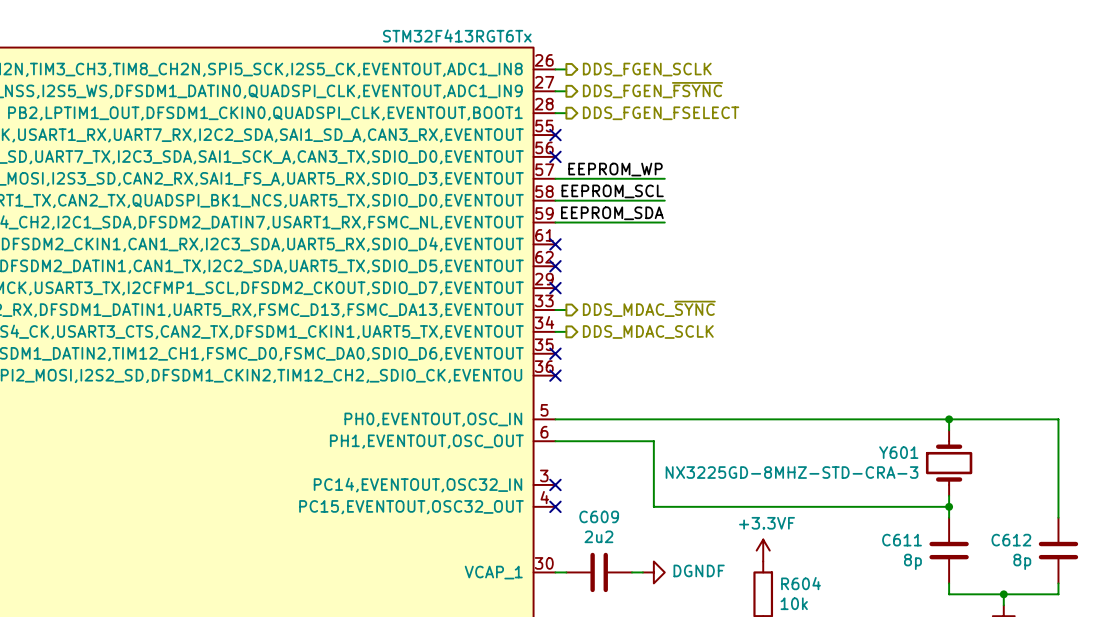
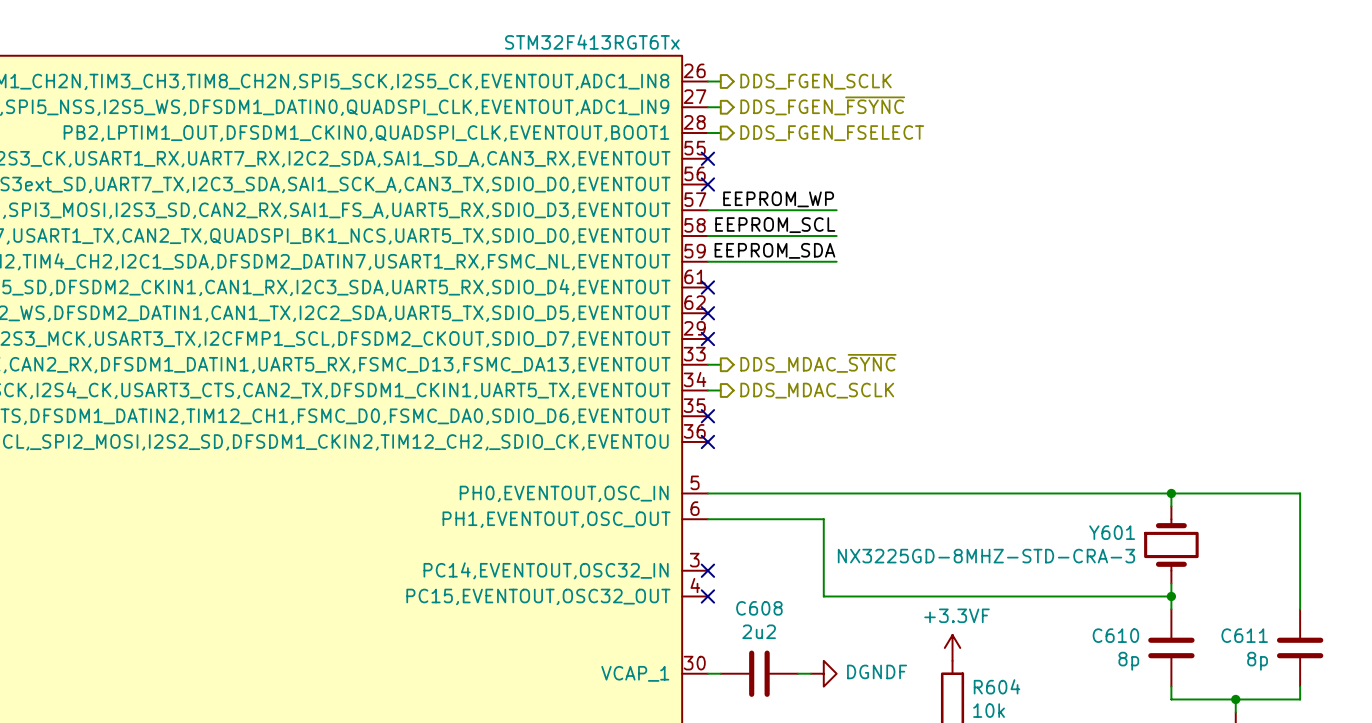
C609 name: C609 (599, 516) -> C608 (759, 608)
C611 name: C611 (902, 540) -> C610 (1115, 635)
C612 name: C612 (1011, 540) -> C611 (1244, 635)

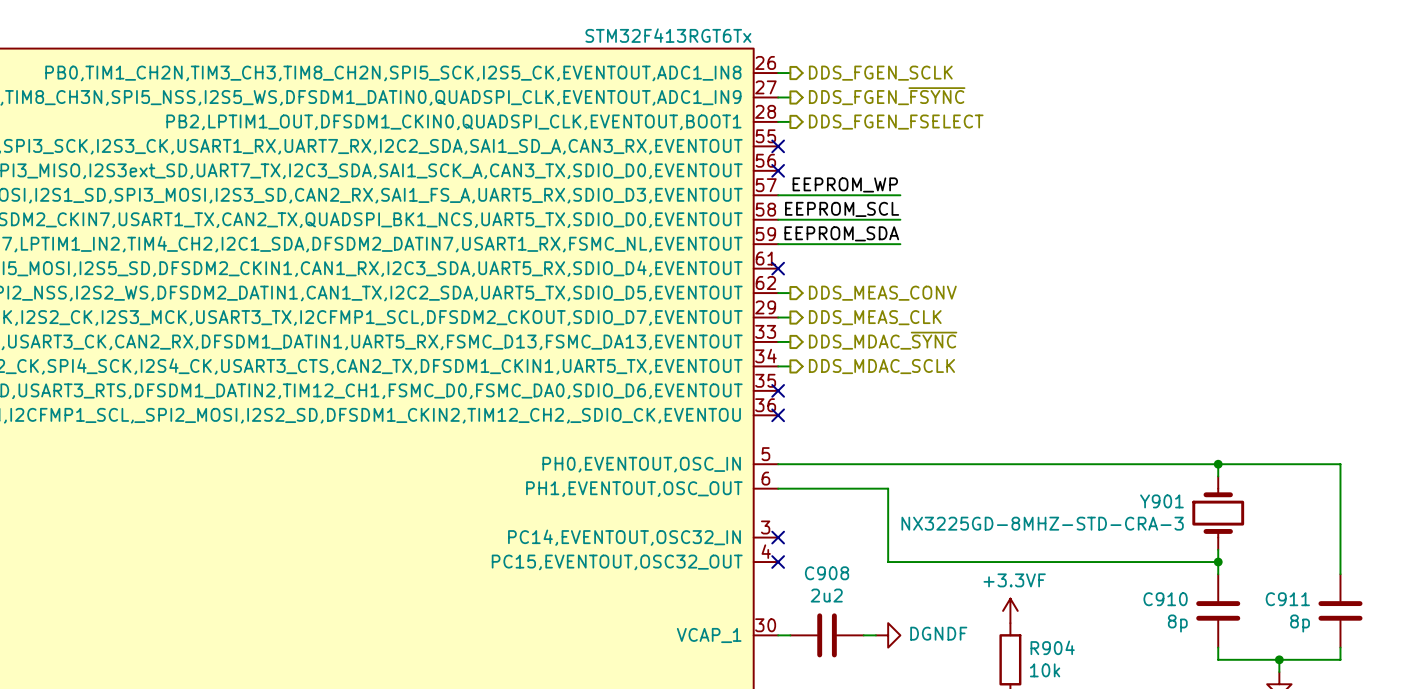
wire: none -> (778, 293) (790, 293)
no-connect mark: (707, 313) -> none
hierarchical label: none -> DDS_MEAS_CONV (882, 293)
wire: none -> (778, 317) (790, 317)
no-connect mark: (707, 338) -> none
hierarchical label: none -> DDS_MEAS_CLK (875, 317)
Y601 name: Y601 (1112, 532) -> Y901 (1161, 501)
C608 name: C608 (759, 608) -> C908 (827, 573)
C610 name: C610 (1115, 635) -> C910 (1165, 599)
C611 name: C611 (1244, 635) -> C911 (1287, 599)
R604 name: R604 (997, 686) -> R904 (1052, 647)

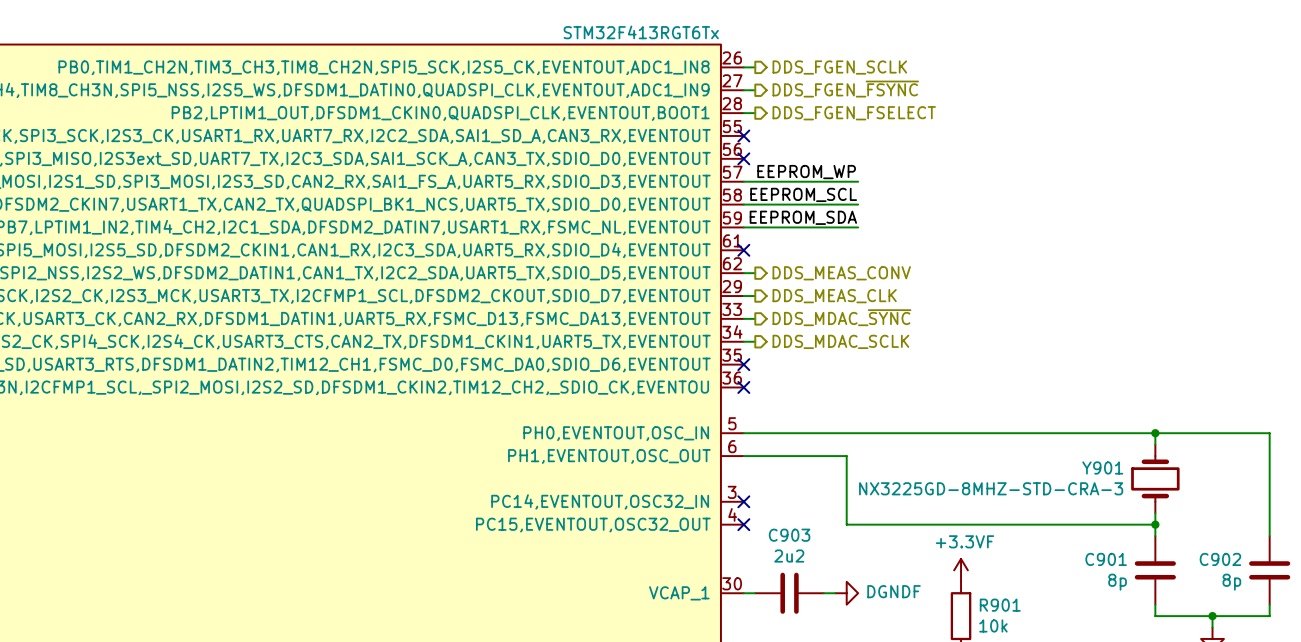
C908 name: C908 (827, 573) -> C903 (789, 535)
C910 name: C910 (1165, 599) -> C901 (1106, 559)
C911 name: C911 (1287, 599) -> C902 (1220, 559)
R904 name: R904 (1052, 647) -> R901 (1000, 605)

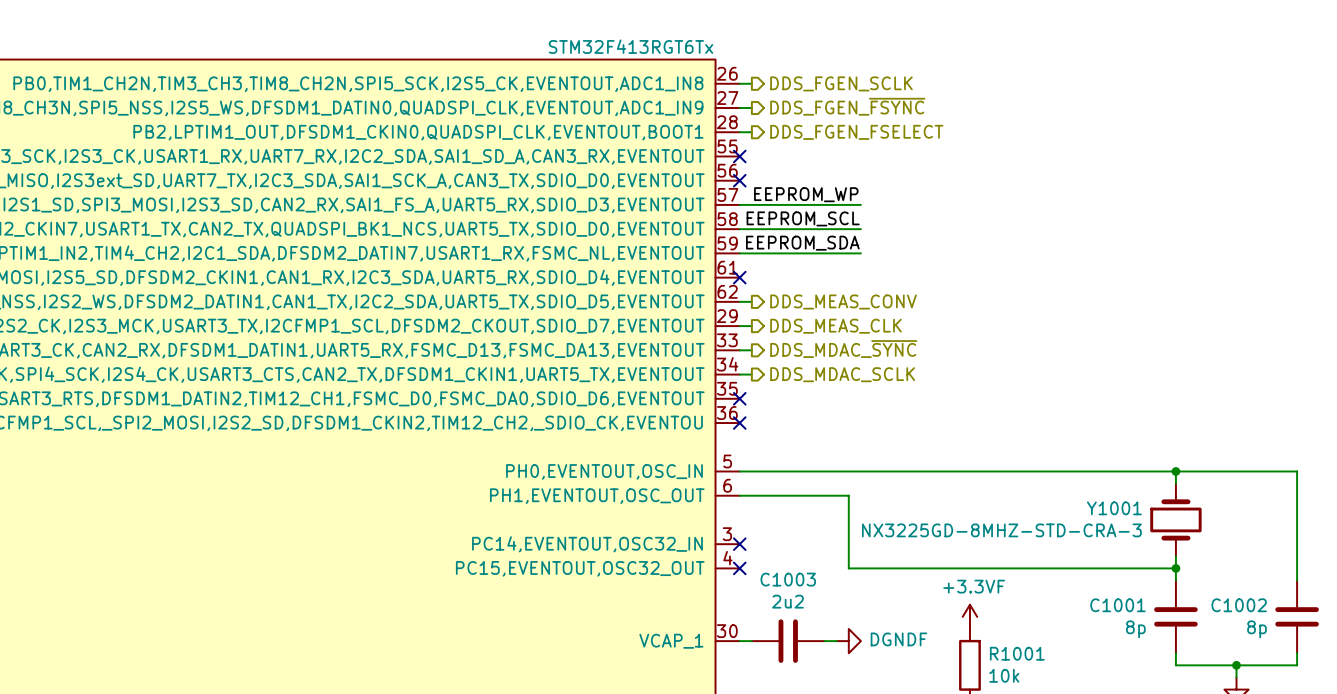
Y901 name: Y901 (1102, 467) -> Y1001 (1114, 508)
C903 name: C903 (789, 535) -> C1003 (788, 579)
C901 name: C901 (1106, 559) -> C1001 (1117, 605)
C902 name: C902 (1220, 559) -> C1002 (1239, 605)
R901 name: R901 (1000, 605) -> R1001 (1017, 653)

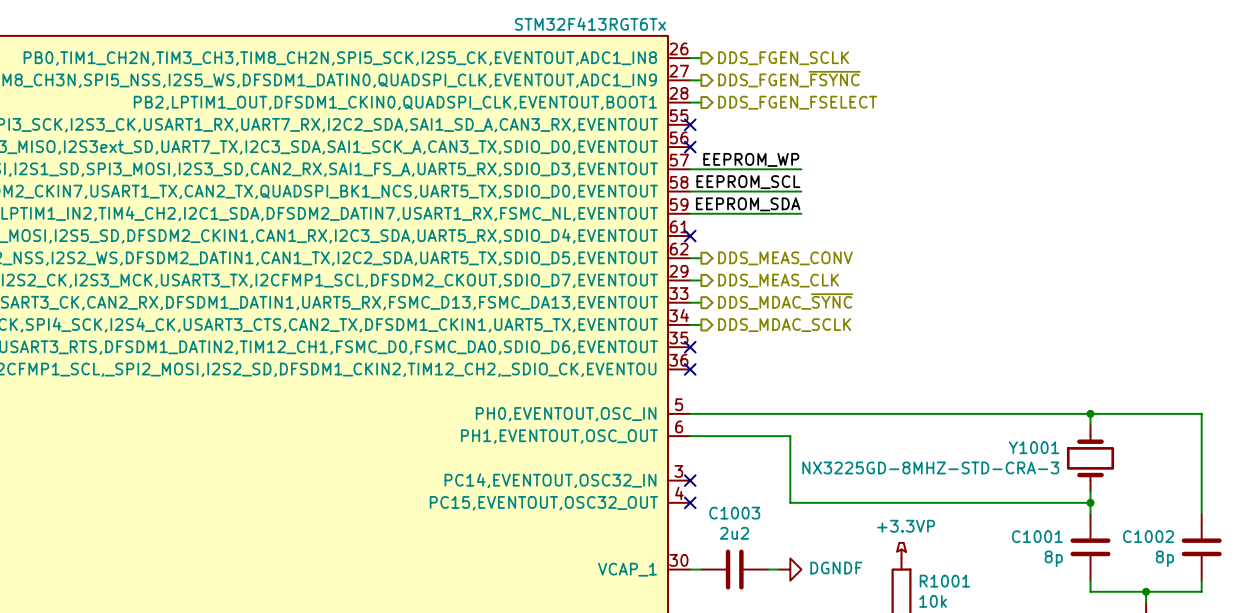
power symbol: +3.3VF (969, 616) -> +3.3VP (901, 550)

